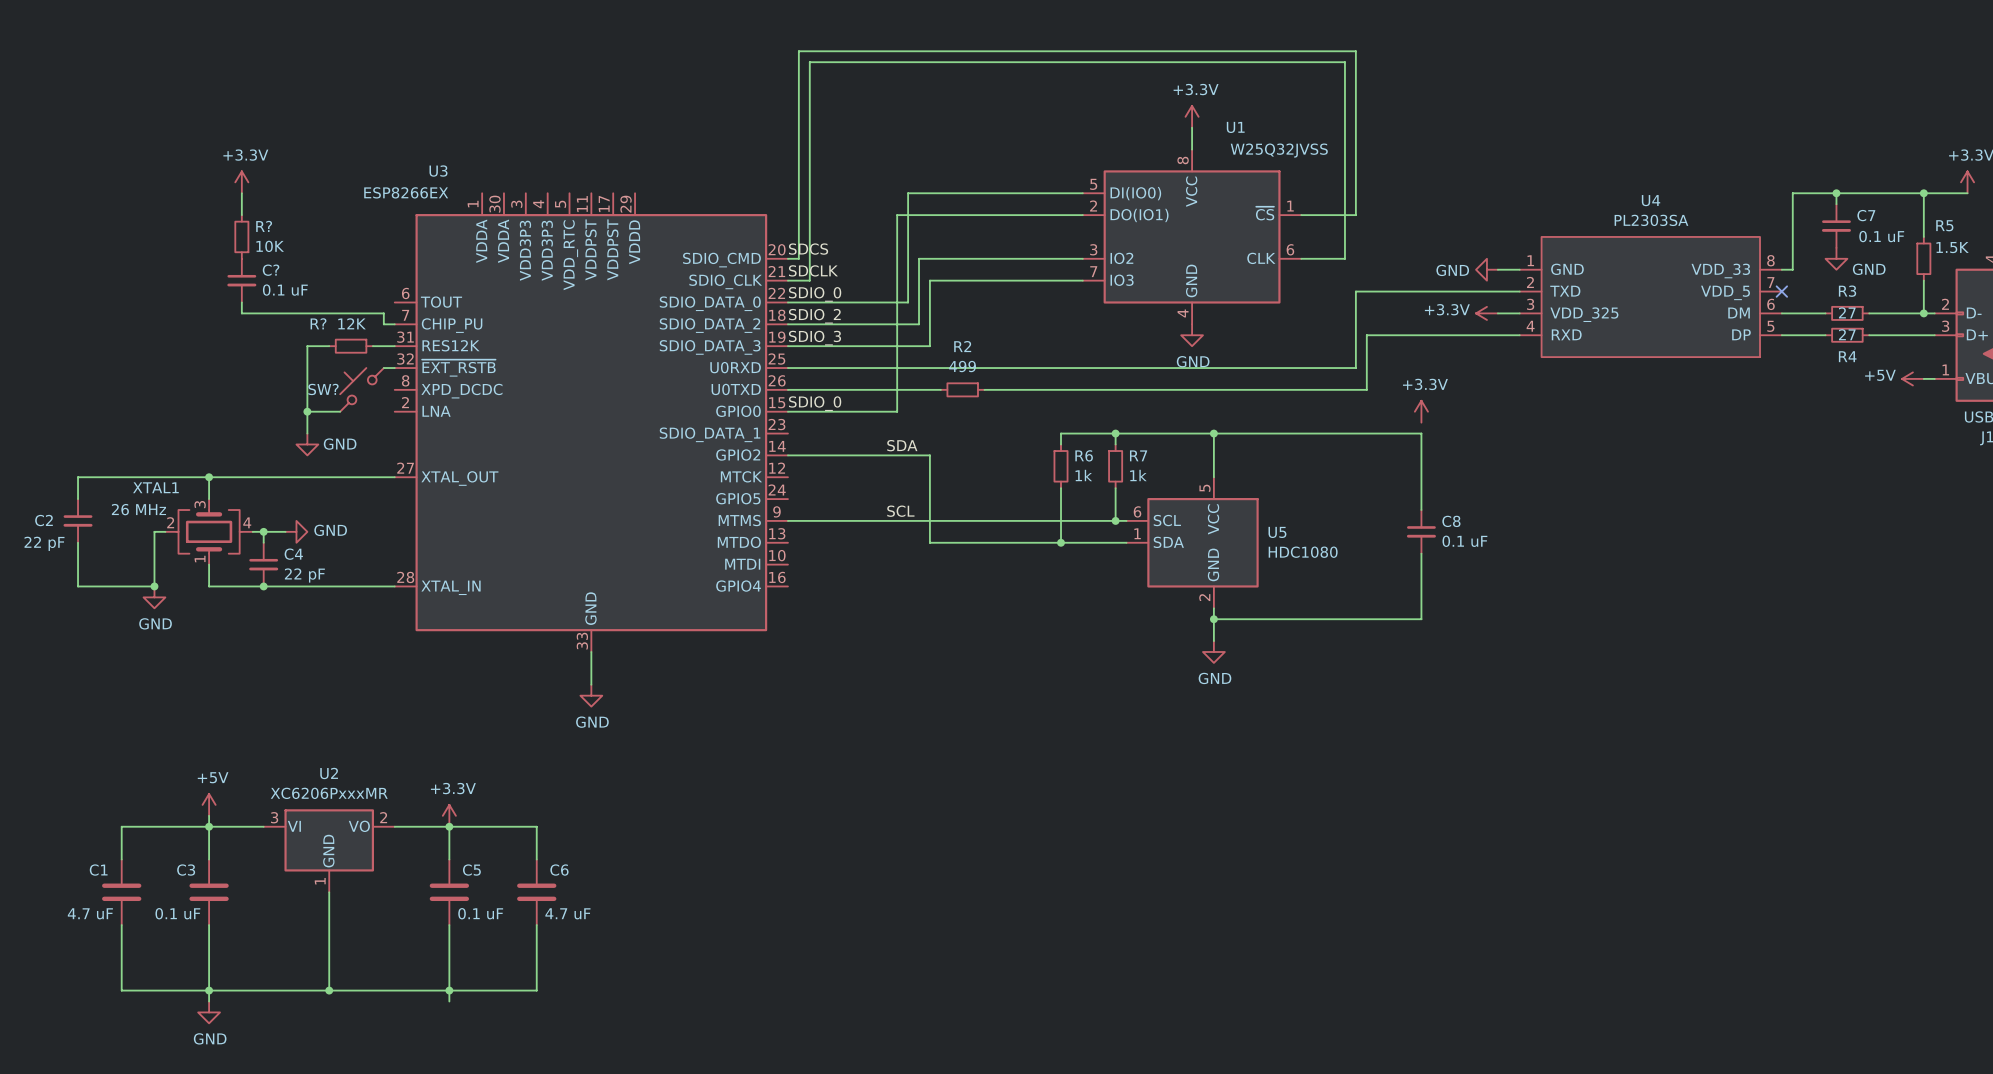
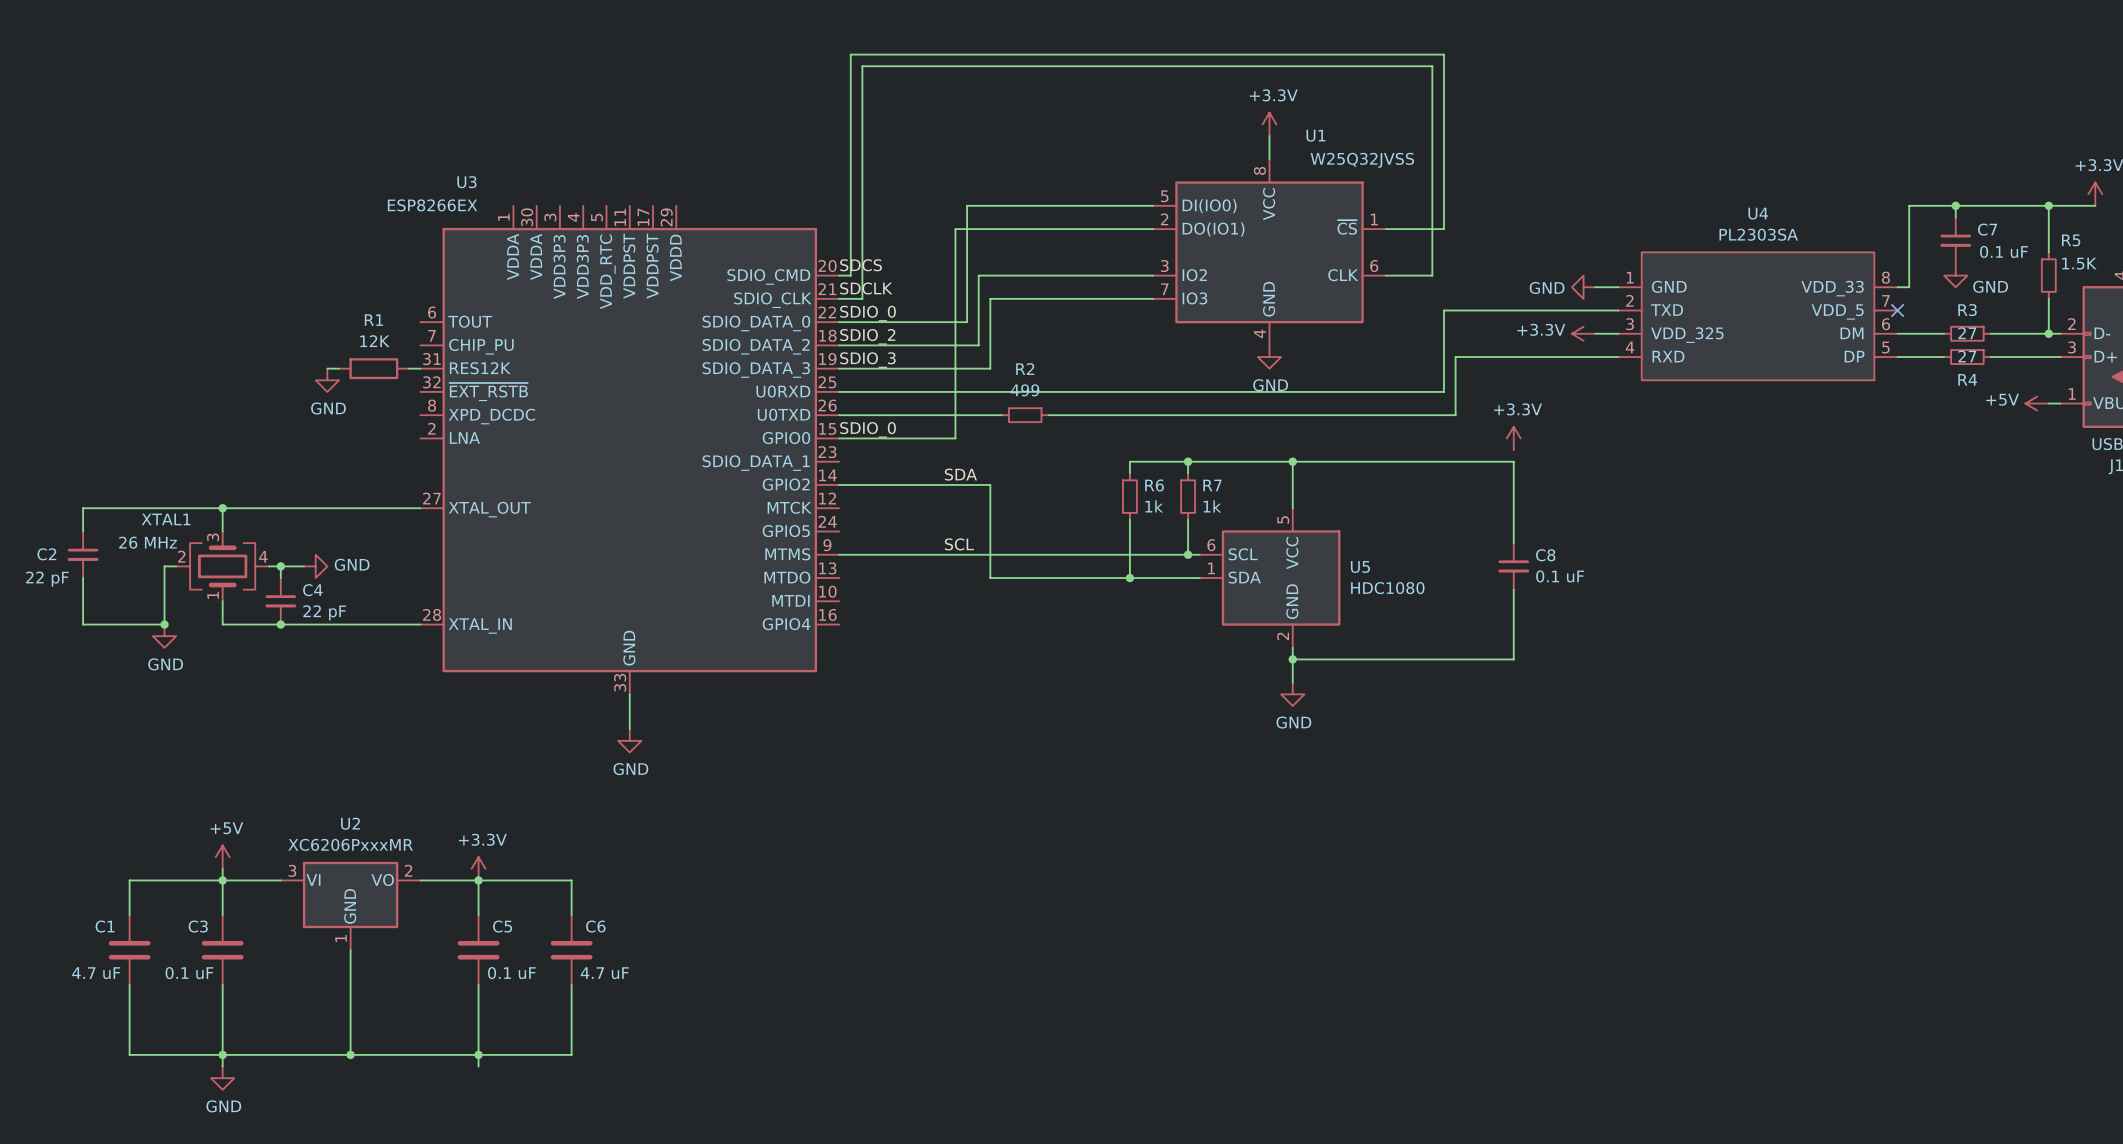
power symbol: +3.3V (241, 182) -> none
wire: (241, 193) (241, 215) -> none
R?: 10K (241, 236) -> none
C?: 0.1 uF (241, 280) -> none
wire: (241, 302) (241, 313) (383, 313) (383, 324) (394, 324) -> none
wire: (307, 346) (307, 433) -> none
R?: 12K (351, 346) -> none
R1: none -> 12K (373, 368)
wire: (383, 368) (394, 368) -> none
SW?: (361, 389) -> none
wire: (307, 411) (340, 411) -> none
junction: (307, 411) -> none
power symbol position: GND (307, 444) -> GND (327, 380)
power symbol text position: GND (340, 444) -> GND (328, 408)

